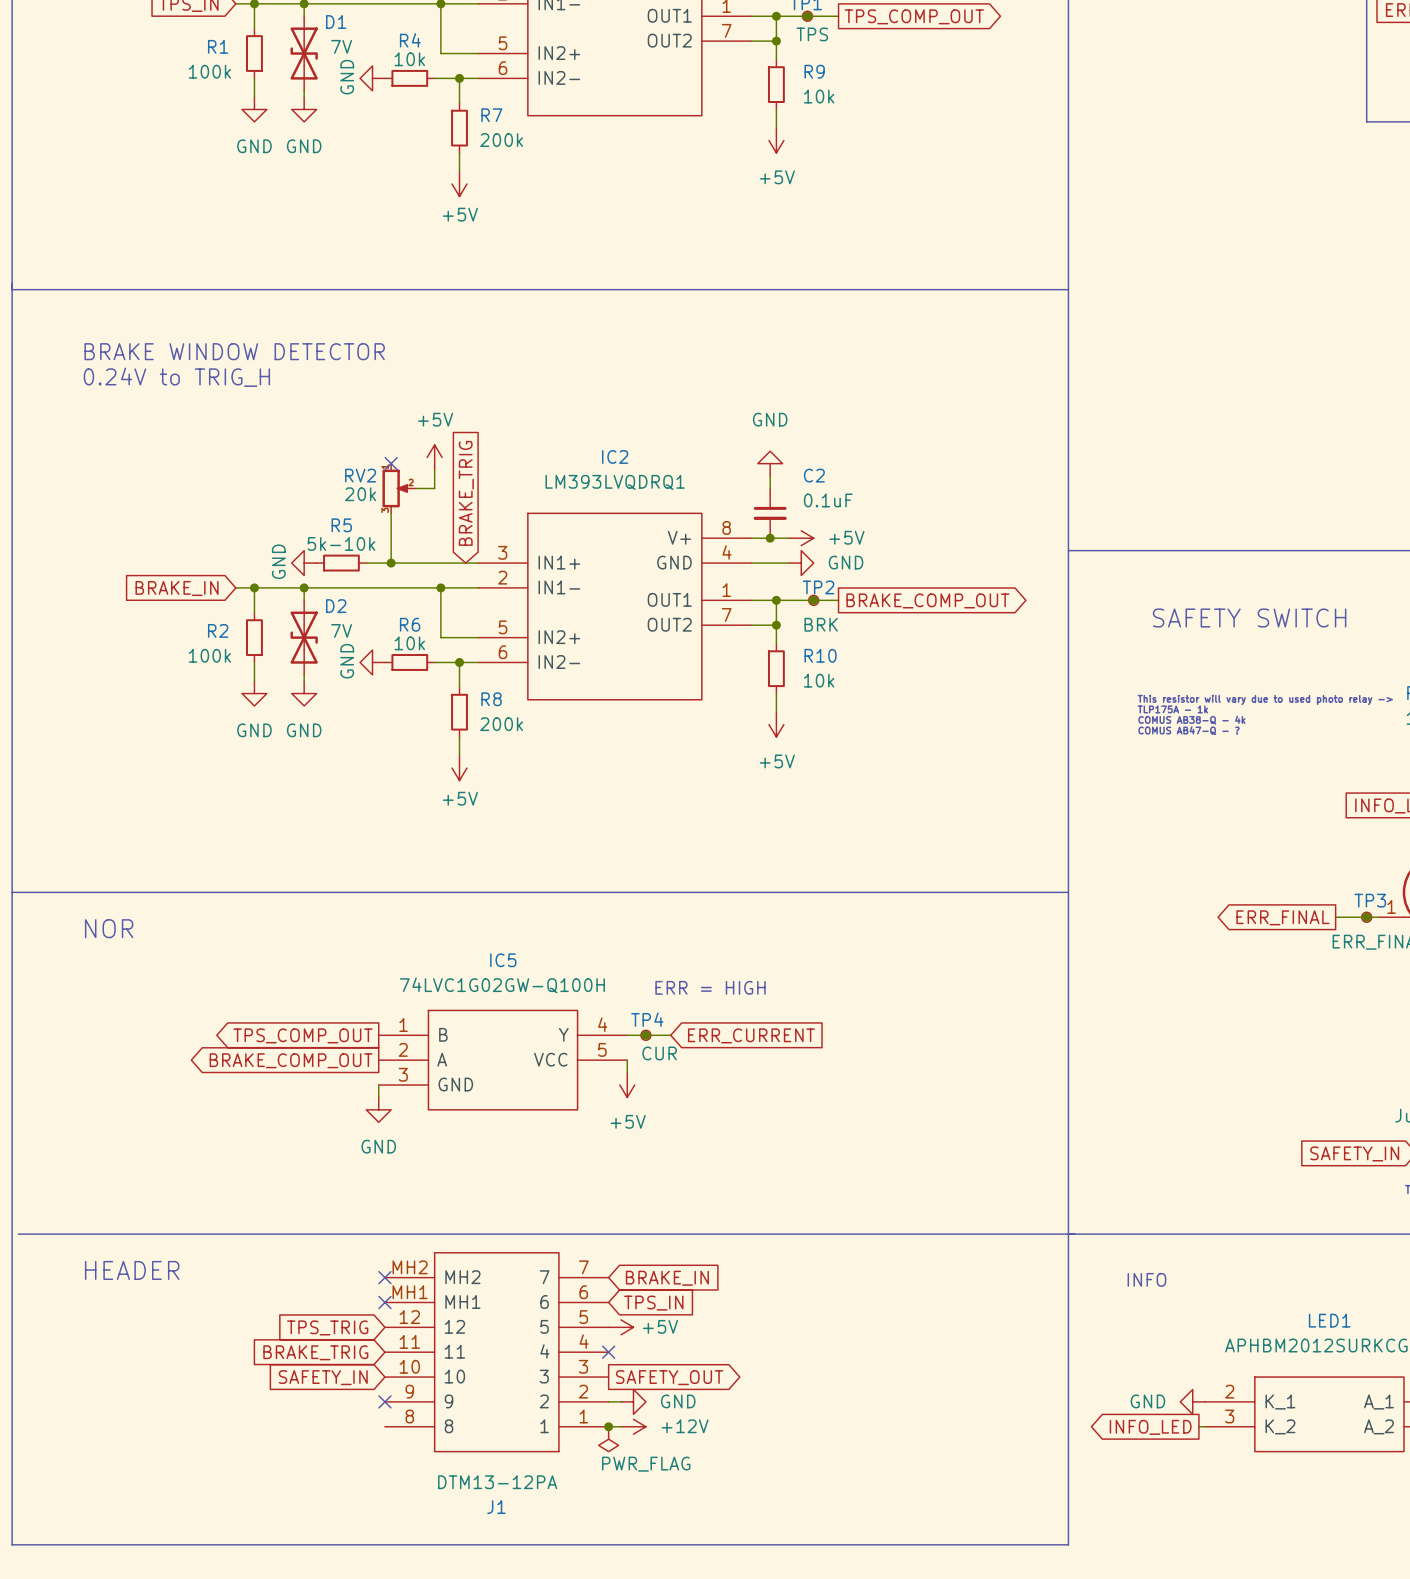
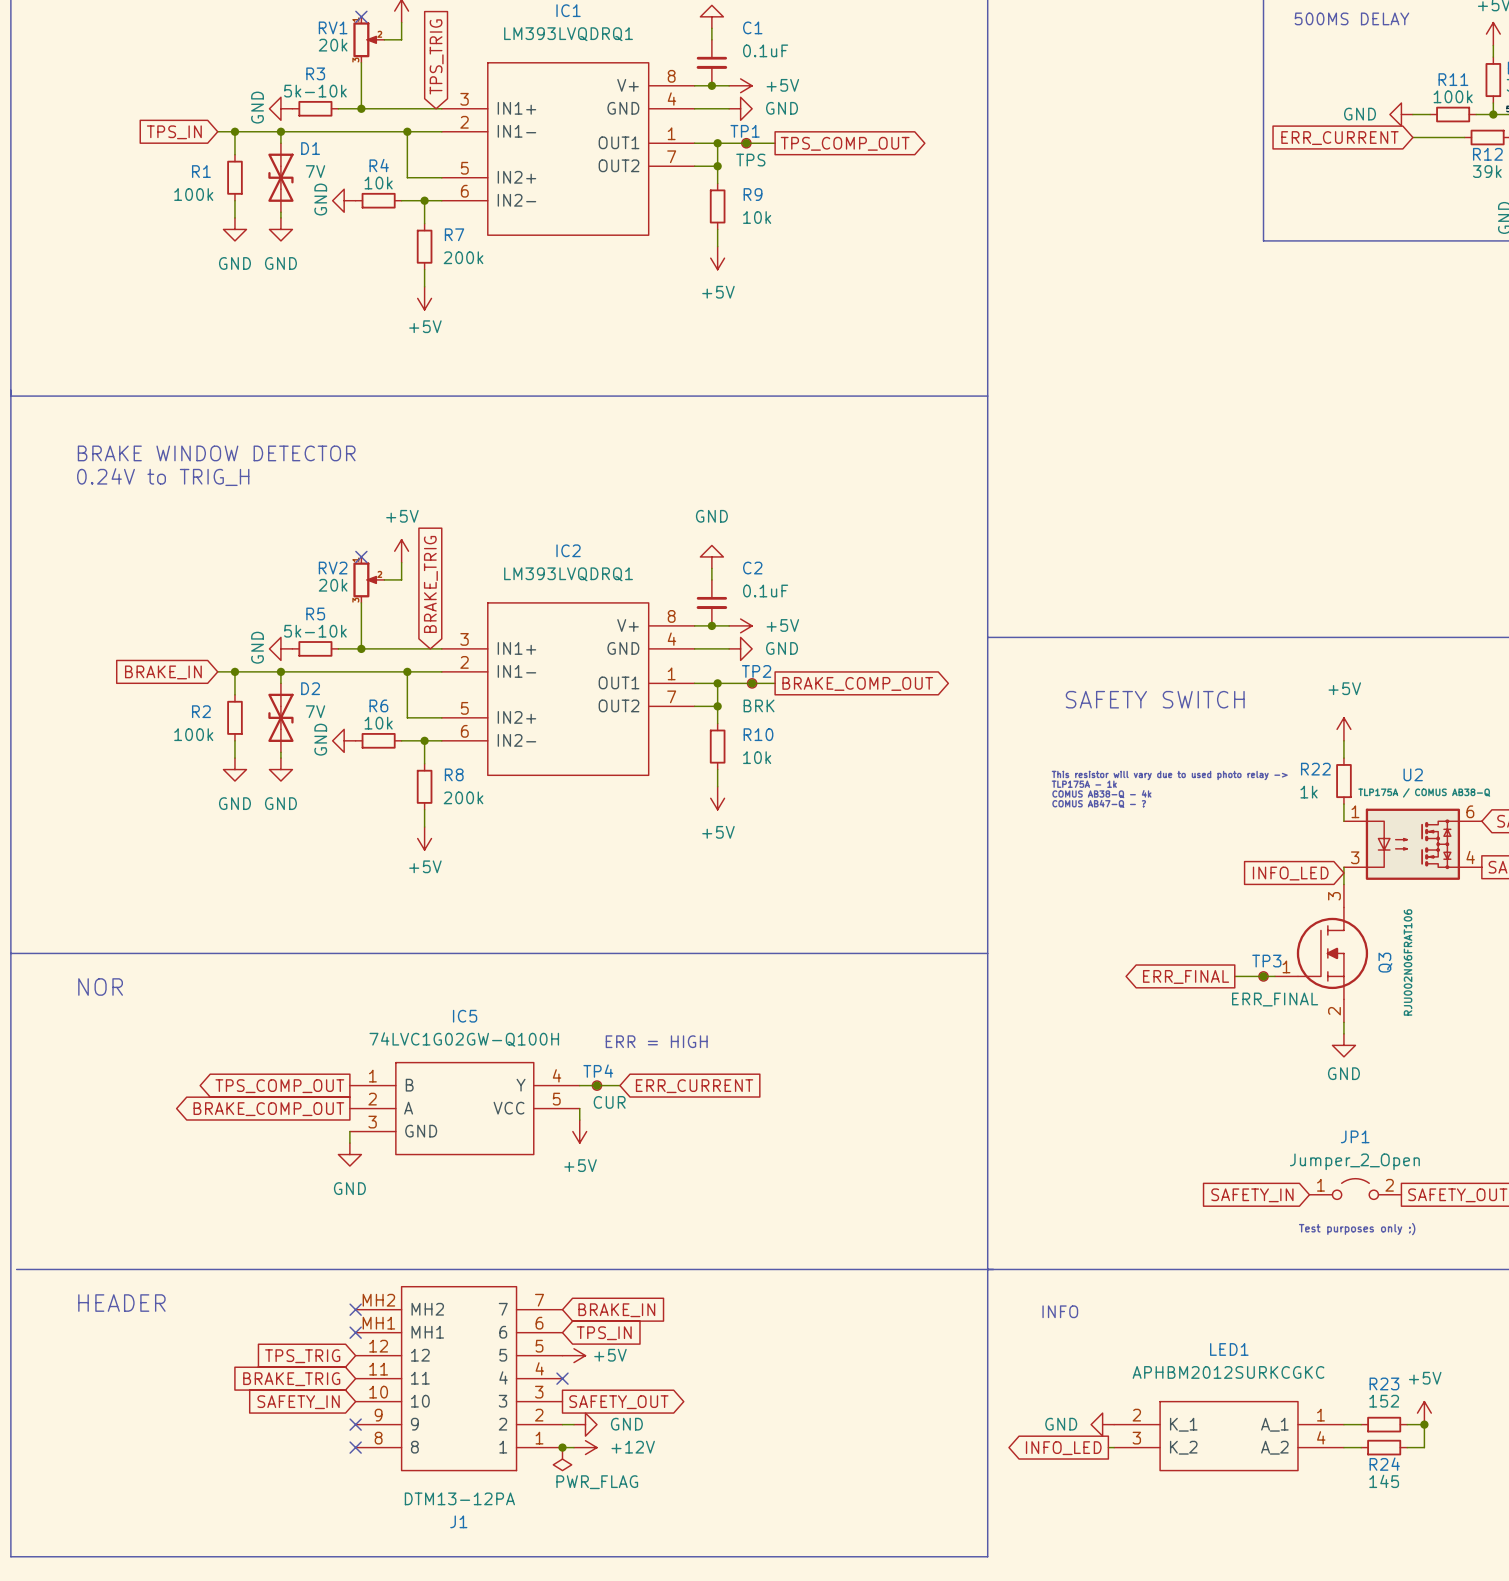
no-connect mark: none -> (355, 1447)

